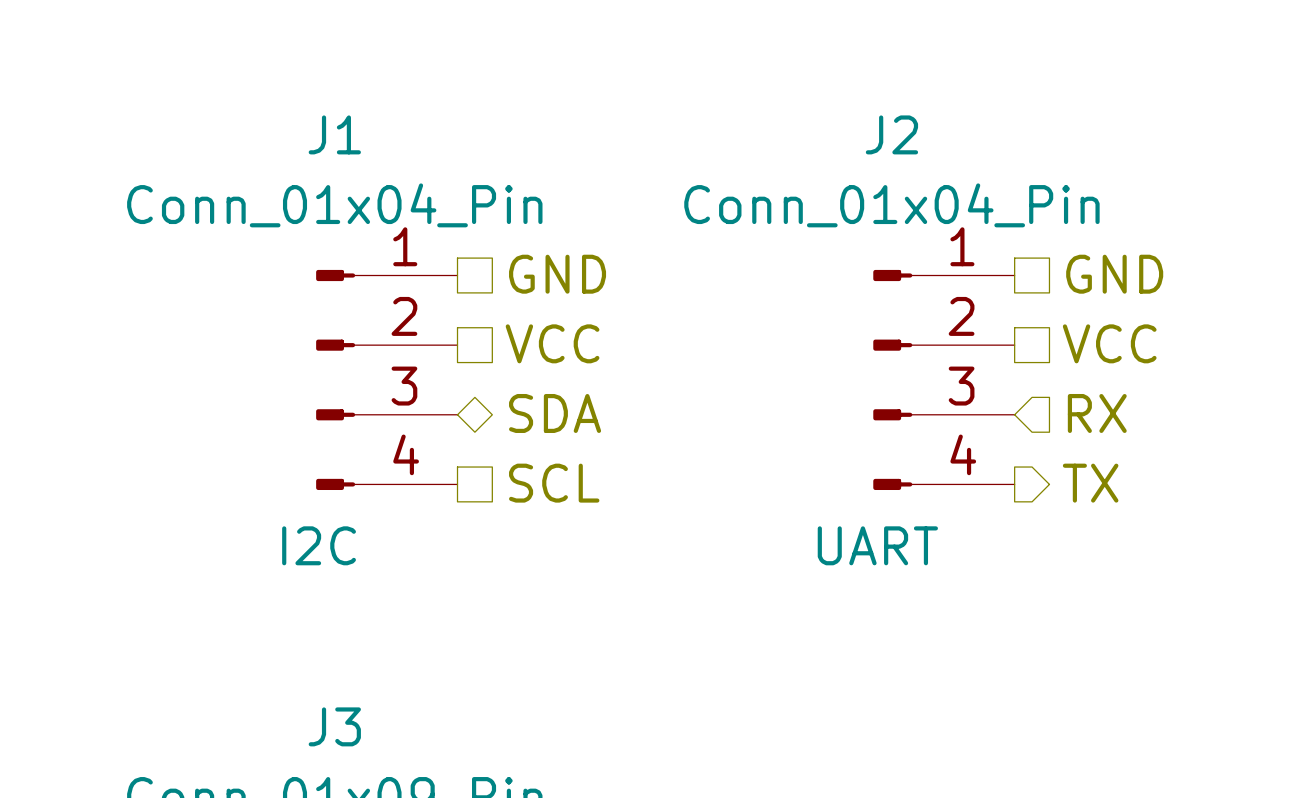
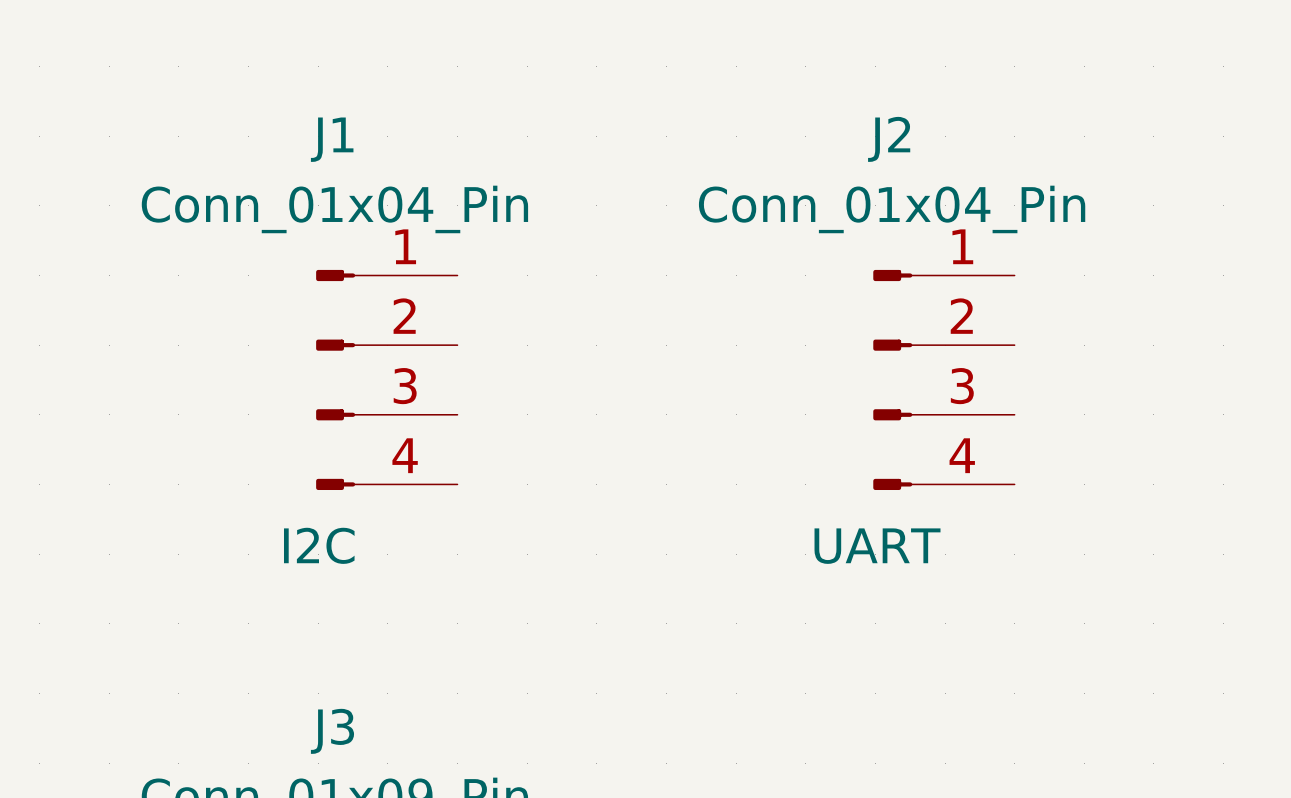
hierarchical label: GND (557, 274) -> none
hierarchical label: GND (1114, 274) -> none
hierarchical label: VCC (552, 343) -> none
hierarchical label: VCC (1109, 343) -> none
hierarchical label: SDA (555, 413) -> none
hierarchical label: RX (1097, 413) -> none
hierarchical label: SCL (554, 483) -> none
hierarchical label: TX (1090, 483) -> none

